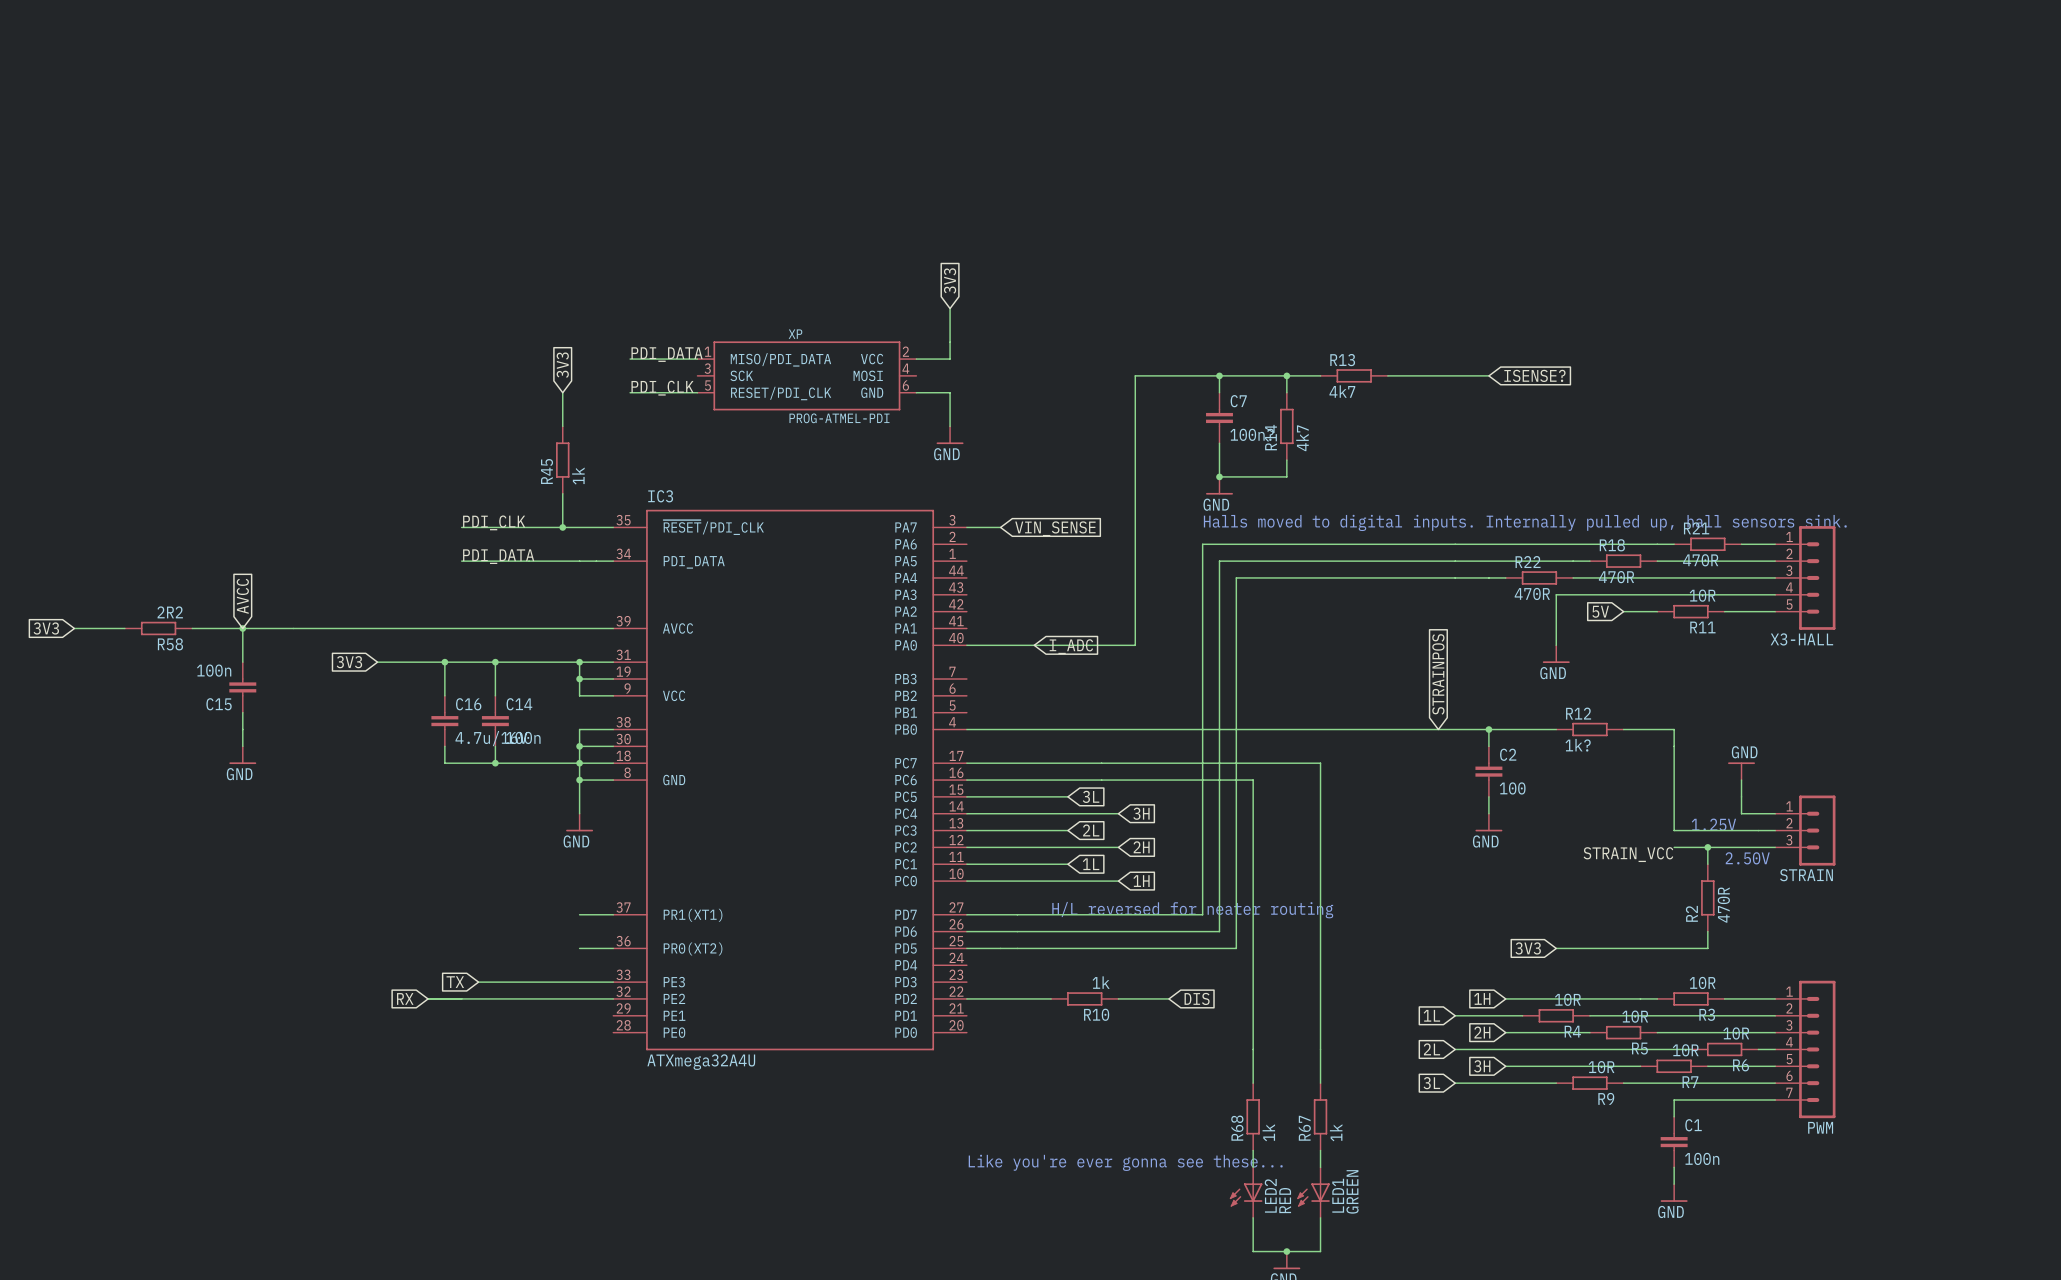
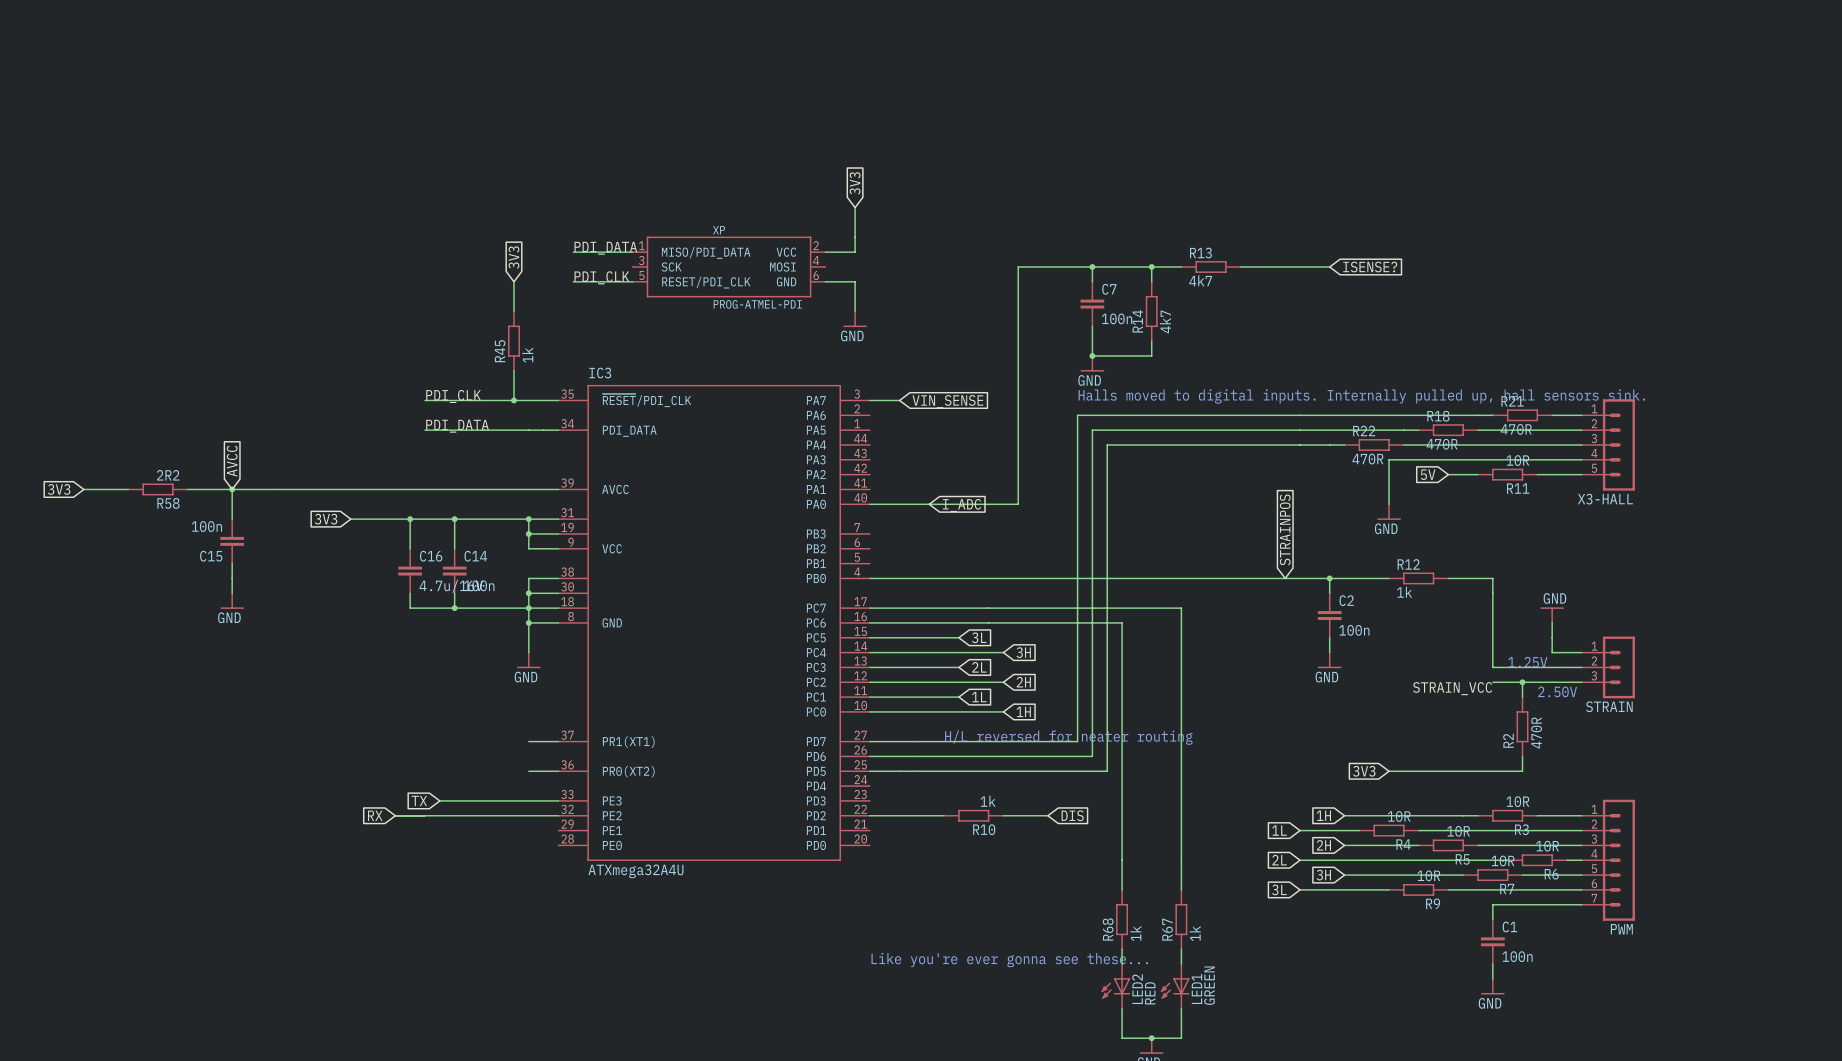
C7 value: 100n? (1252, 434) -> 100n (1117, 318)
R12 value: 1k? (1578, 745) -> 1k (1404, 592)
C2 value: 100 (1512, 788) -> 100n (1354, 630)

